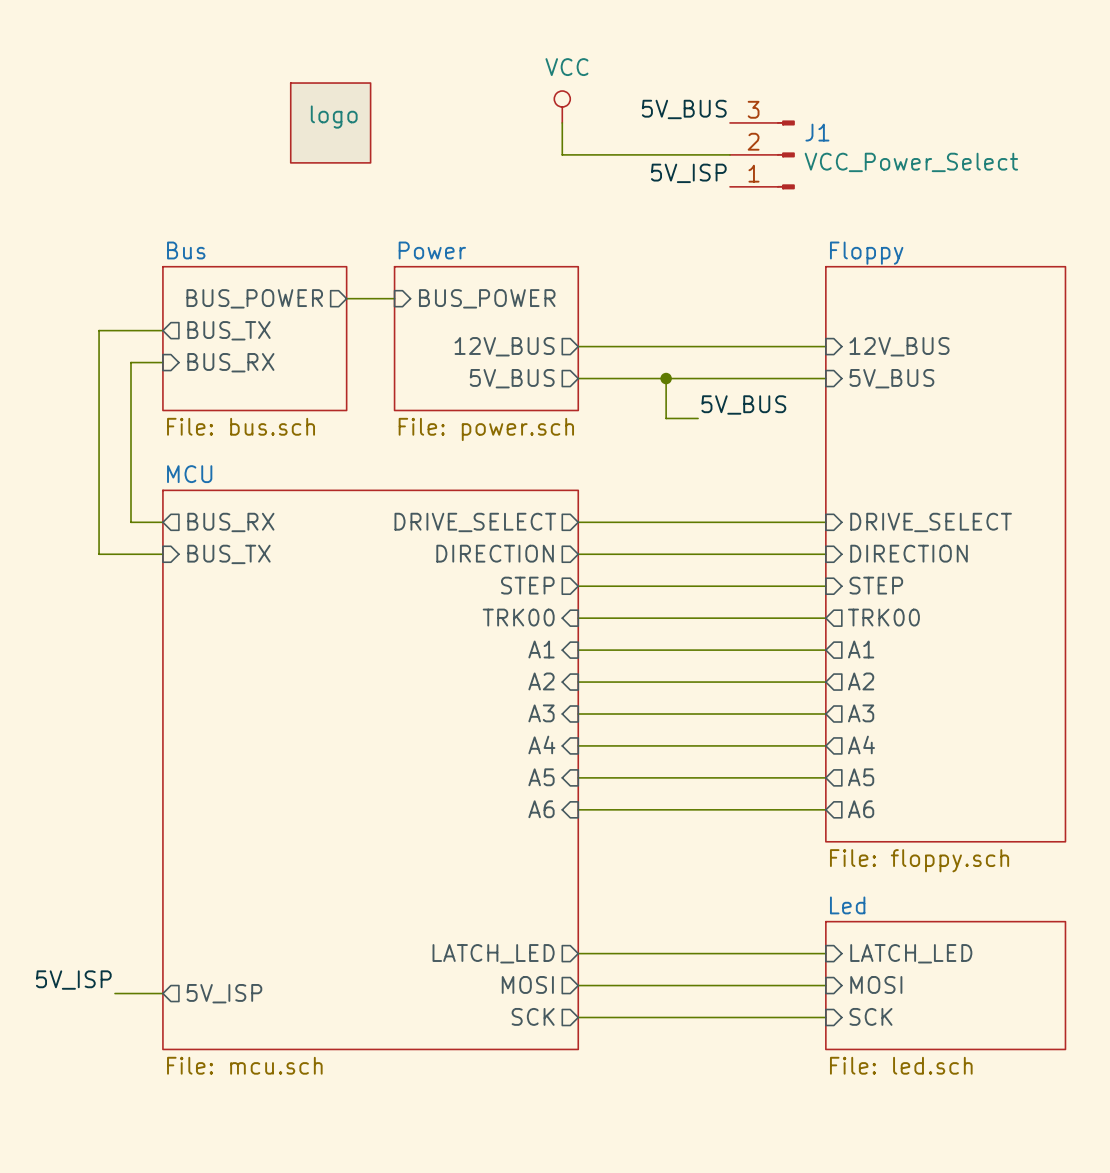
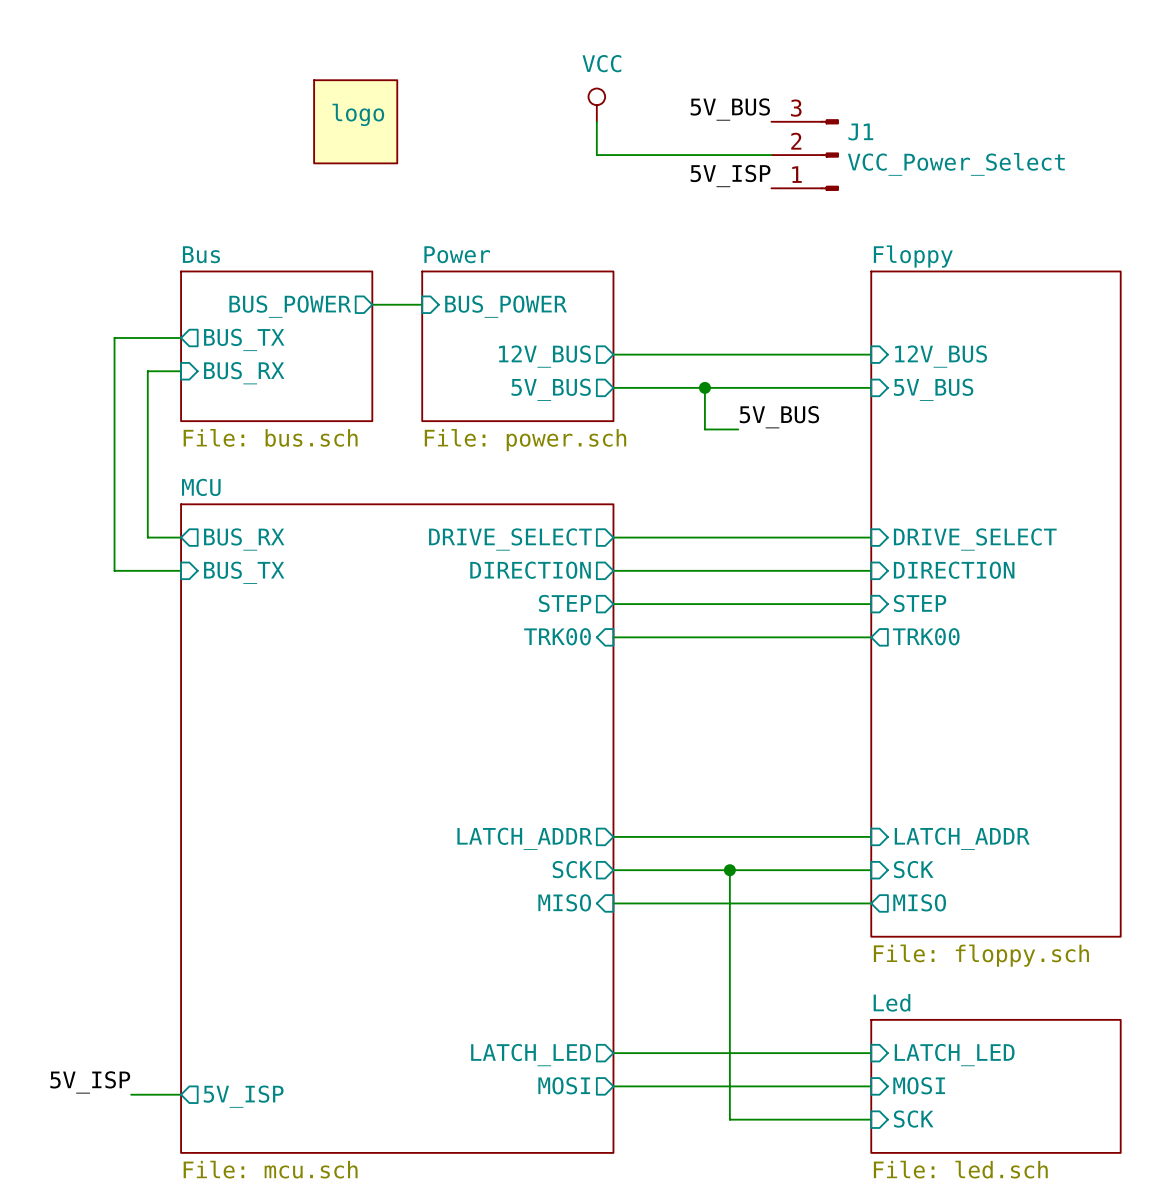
sheet Floppy: File: floppy.sch (945, 554) -> none
sheet Floppy: none -> File: floppy.sch (995, 604)
sheet pin: A1 (541, 649) -> none
sheet pin: A1 (861, 649) -> none
wire: (578, 650) (825, 650) -> none
sheet pin: A2 (541, 681) -> none
sheet pin: A2 (861, 681) -> none
wire: (578, 682) (825, 682) -> none
sheet pin: A3 (541, 713) -> none
wire: (578, 713) (825, 713) -> none
sheet pin: A3 (861, 713) -> none
sheet pin: A4 (541, 744) -> none
sheet pin: A4 (861, 744) -> none
wire: (578, 745) (825, 745) -> (613, 903) (871, 903)
sheet MCU: File: mcu.sch (370, 769) -> none
sheet pin: A5 (541, 777) -> none
wire: (578, 777) (825, 777) -> (613, 870) (871, 870)
sheet pin: A5 (861, 777) -> none
sheet MCU: none -> File: mcu.sch (397, 828)
sheet pin shape: input (541, 809) -> output (524, 838)
sheet pin: A6 (541, 809) -> LATCH_ADDR (524, 838)
sheet pin shape: output (861, 809) -> input (962, 838)
sheet pin: A6 (861, 809) -> LATCH_ADDR (962, 838)
sheet pin: none -> SCK (572, 869)
wire: none -> (729, 870) (729, 1119) (871, 1119)
junction: none -> (729, 870)
sheet pin: none -> SCK (913, 869)
sheet pin: none -> MISO (564, 902)
sheet pin: none -> MISO (919, 902)
sheet pin: LATCH_LED (493, 953) -> none
wire: (578, 953) (825, 953) -> none
sheet pin: LATCH_LED (911, 953) -> none
label position: 5V_ISP (73, 980) -> 5V_ISP (90, 1082)
sheet pin position: MOSI (527, 984) -> MOSI (564, 1085)
sheet pin position: MOSI (876, 984) -> MOSI (919, 1085)
wire: (578, 985) (825, 985) -> (613, 1086) (871, 1086)
sheet Led position: (945, 985) -> (995, 1086)
wire: (115, 993) (162, 993) -> (131, 1094) (181, 1094)
sheet pin position: 5V_ISP (224, 993) -> 5V_ISP (243, 1096)
sheet pin: SCK (533, 1016) -> LATCH_LED (531, 1055)
sheet pin: SCK (870, 1016) -> LATCH_LED (954, 1055)
sheet pin: none -> SCK (913, 1119)

